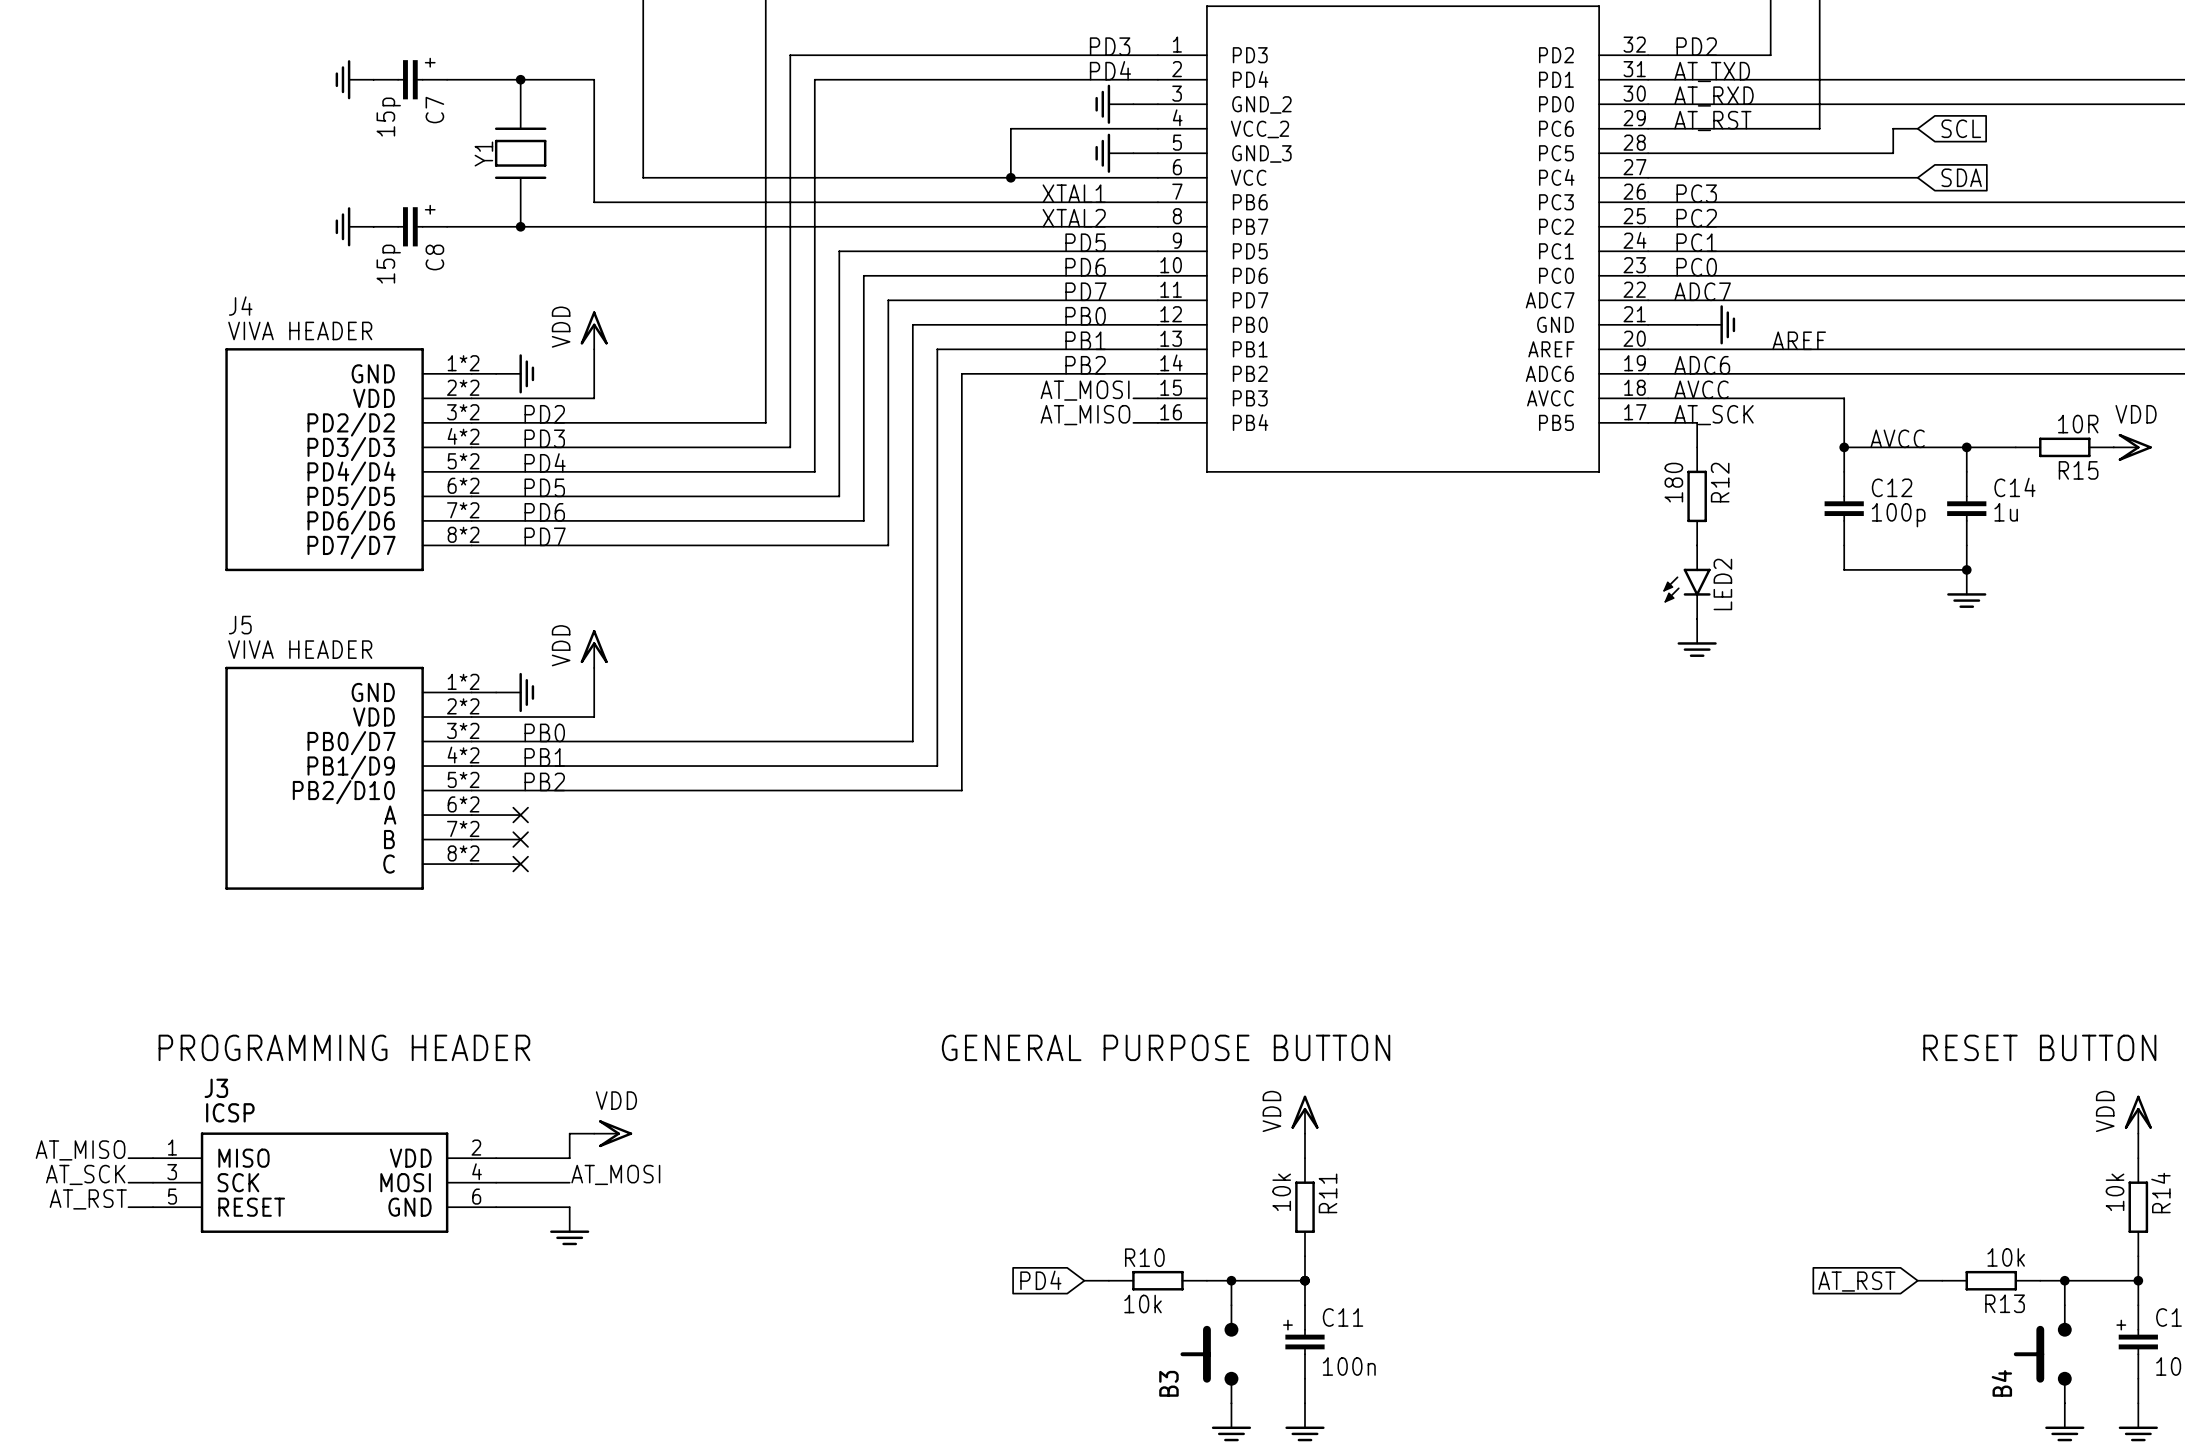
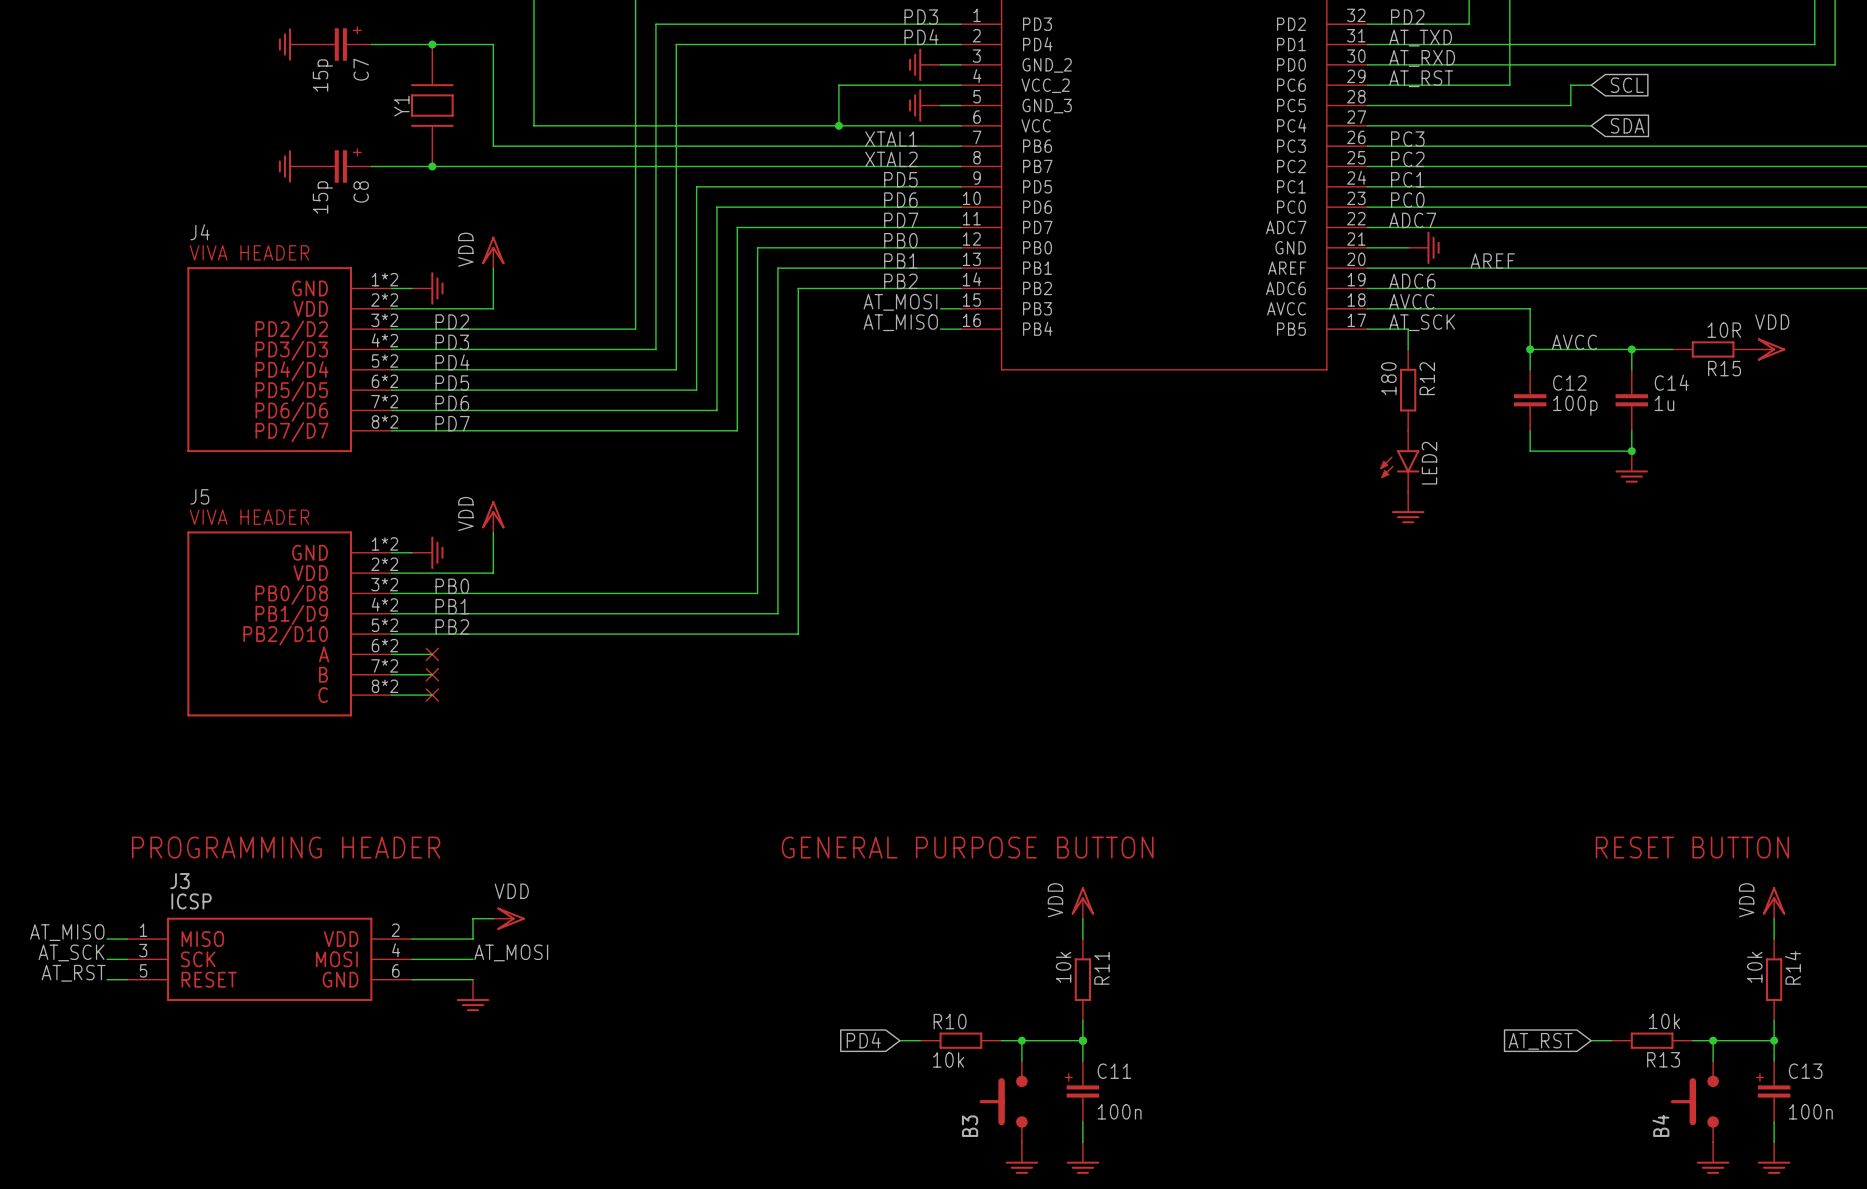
J5 text: PB0/D7 (351, 743) -> PB0/D8 (291, 594)

